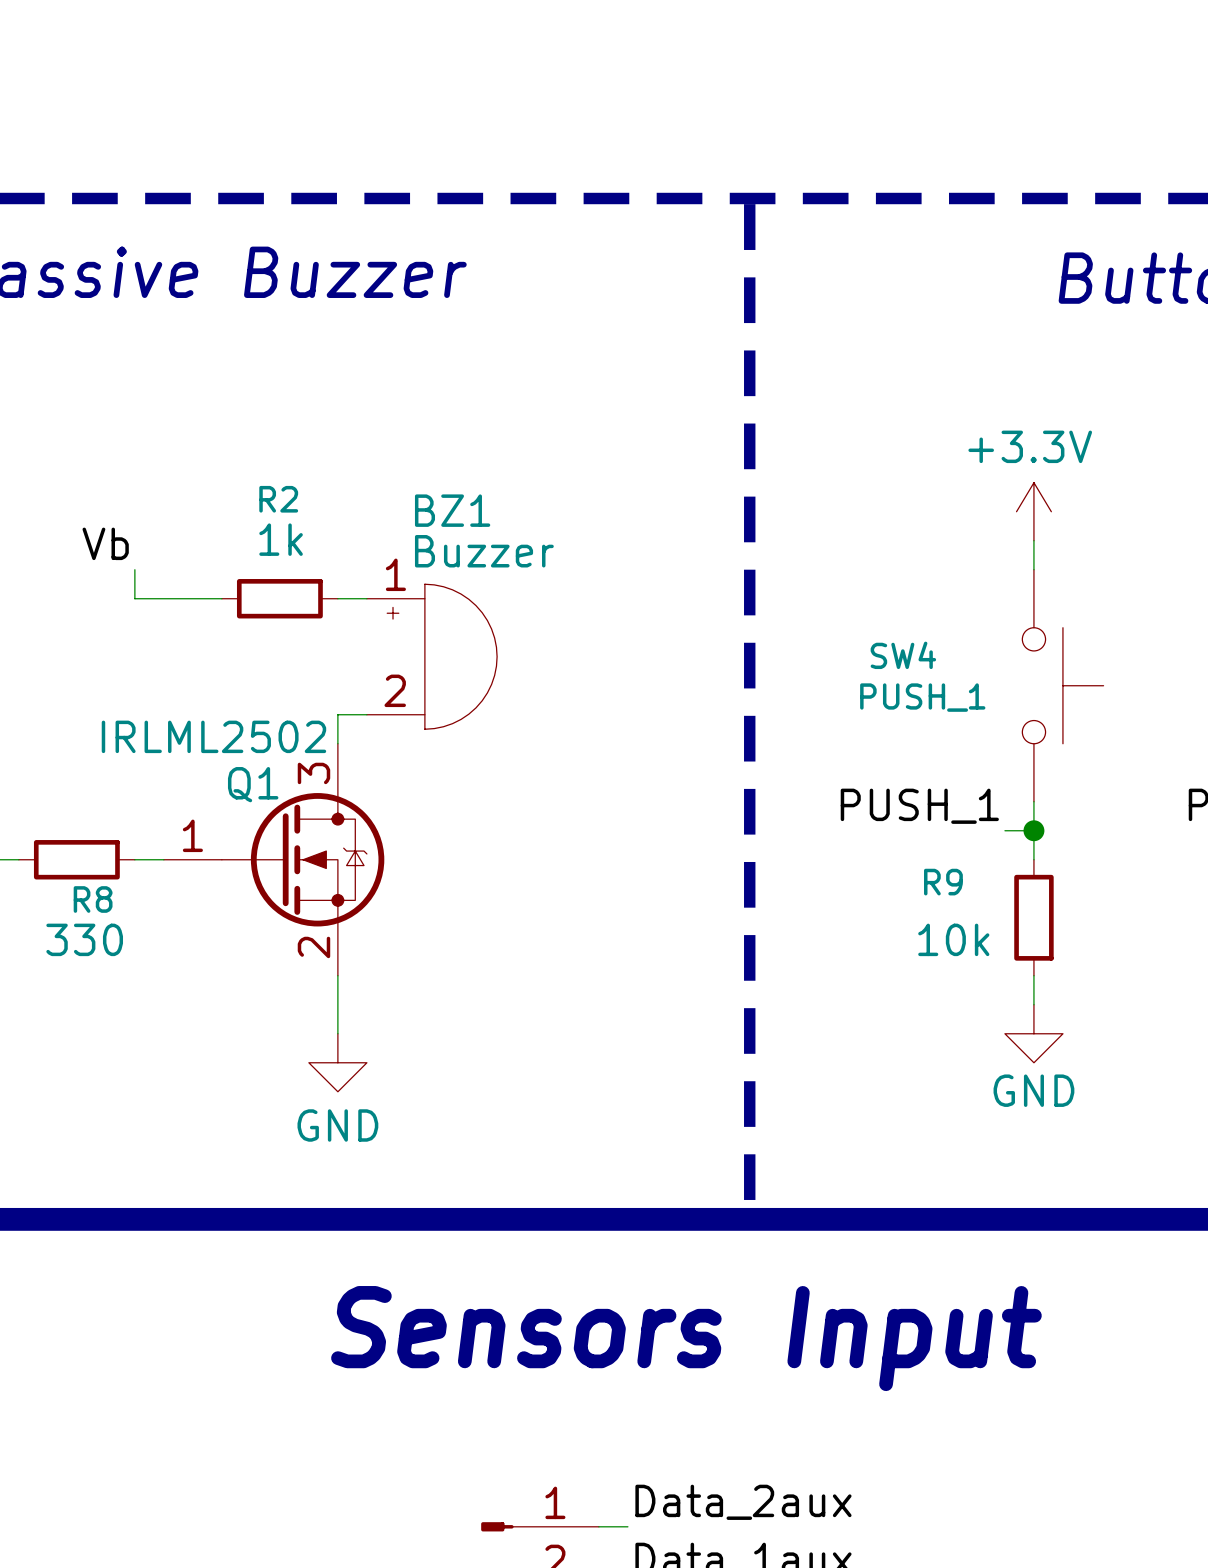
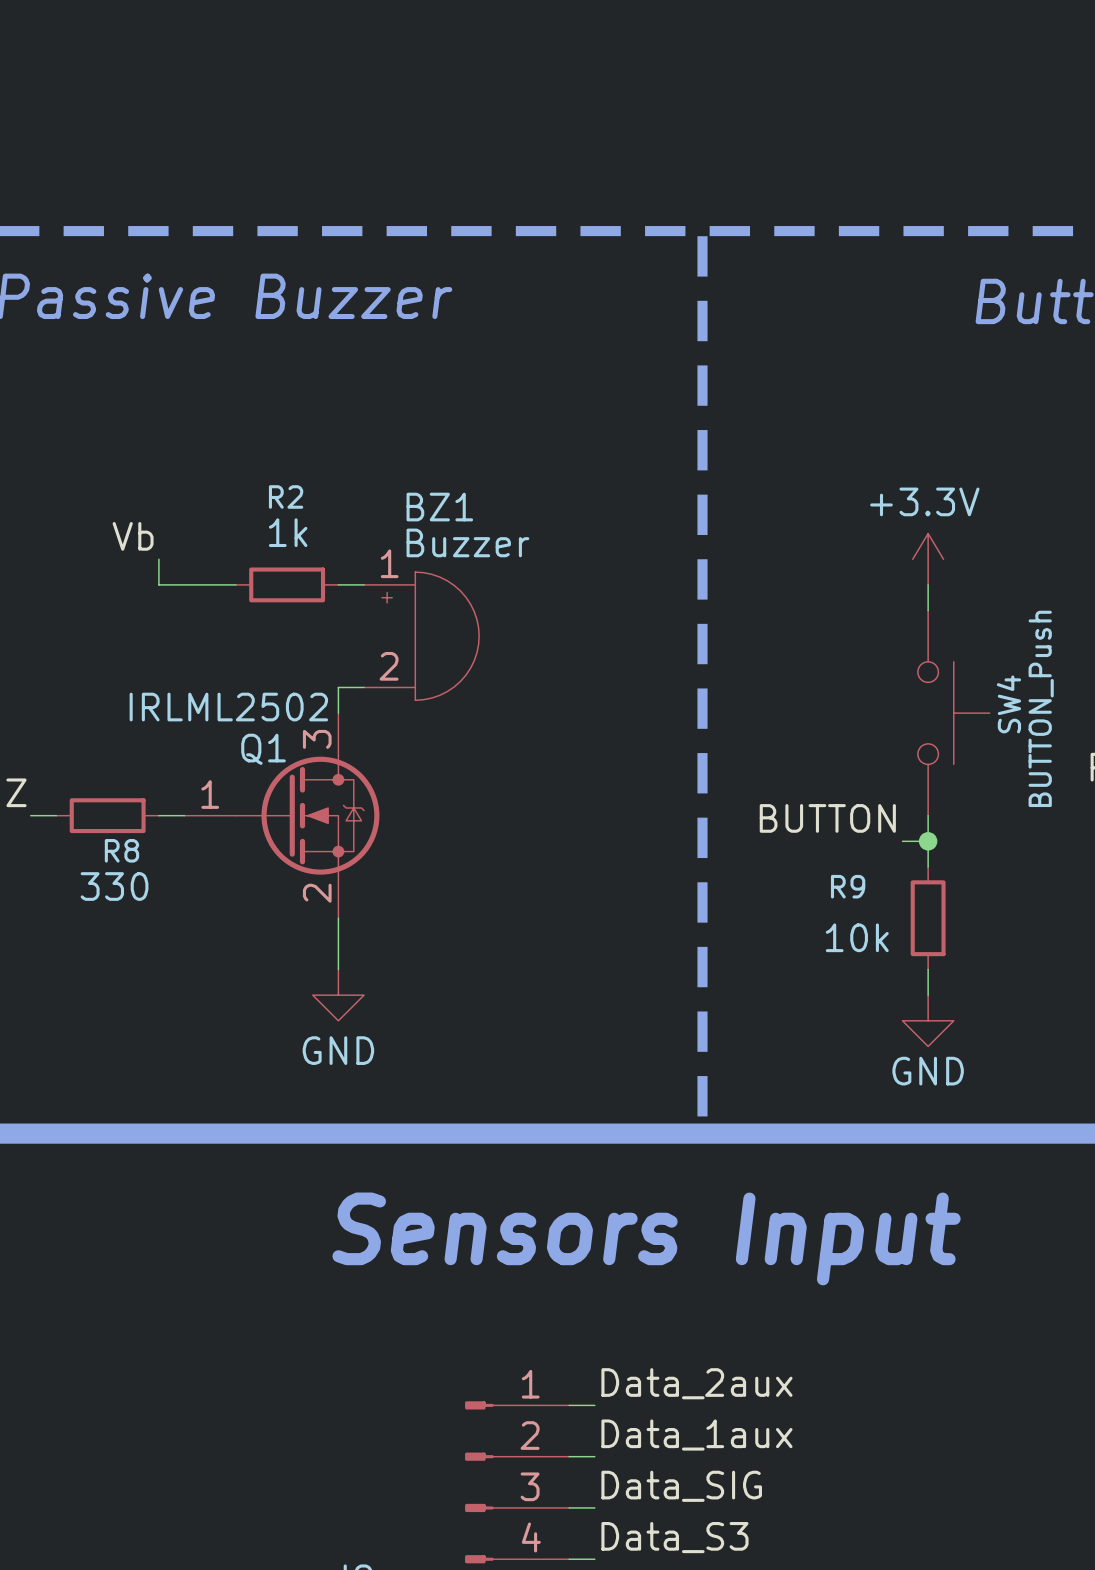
power symbol position: +3.3V (1033, 511) -> +3.3V (928, 559)
wire: (1033, 540) (1033, 569) -> (928, 584) (928, 610)
SW4 name rotation: 0° (903, 655) -> 90° counterclockwise (1008, 704)
SW4 name position: SW4 (903, 655) -> SW4 (1008, 704)
SW4 position: (1062, 685) -> (953, 713)
SW4 value: PUSH_1 (922, 697) -> BUTTON_Push (1041, 708)
wire: (1033, 801) (1033, 859) -> (928, 815) (928, 866)
label: PUSH_1 (919, 806) -> none
wire: (1004, 830) (1033, 830) -> (902, 841) (928, 841)
junction position: (1033, 830) -> (928, 841)
label: none -> BUTTON (827, 818)
R9 position: (1033, 917) -> (928, 918)
wire: (1033, 975) (1033, 1004) -> (928, 969) (928, 995)
power symbol position: GND (1033, 1033) -> GND (928, 1020)

